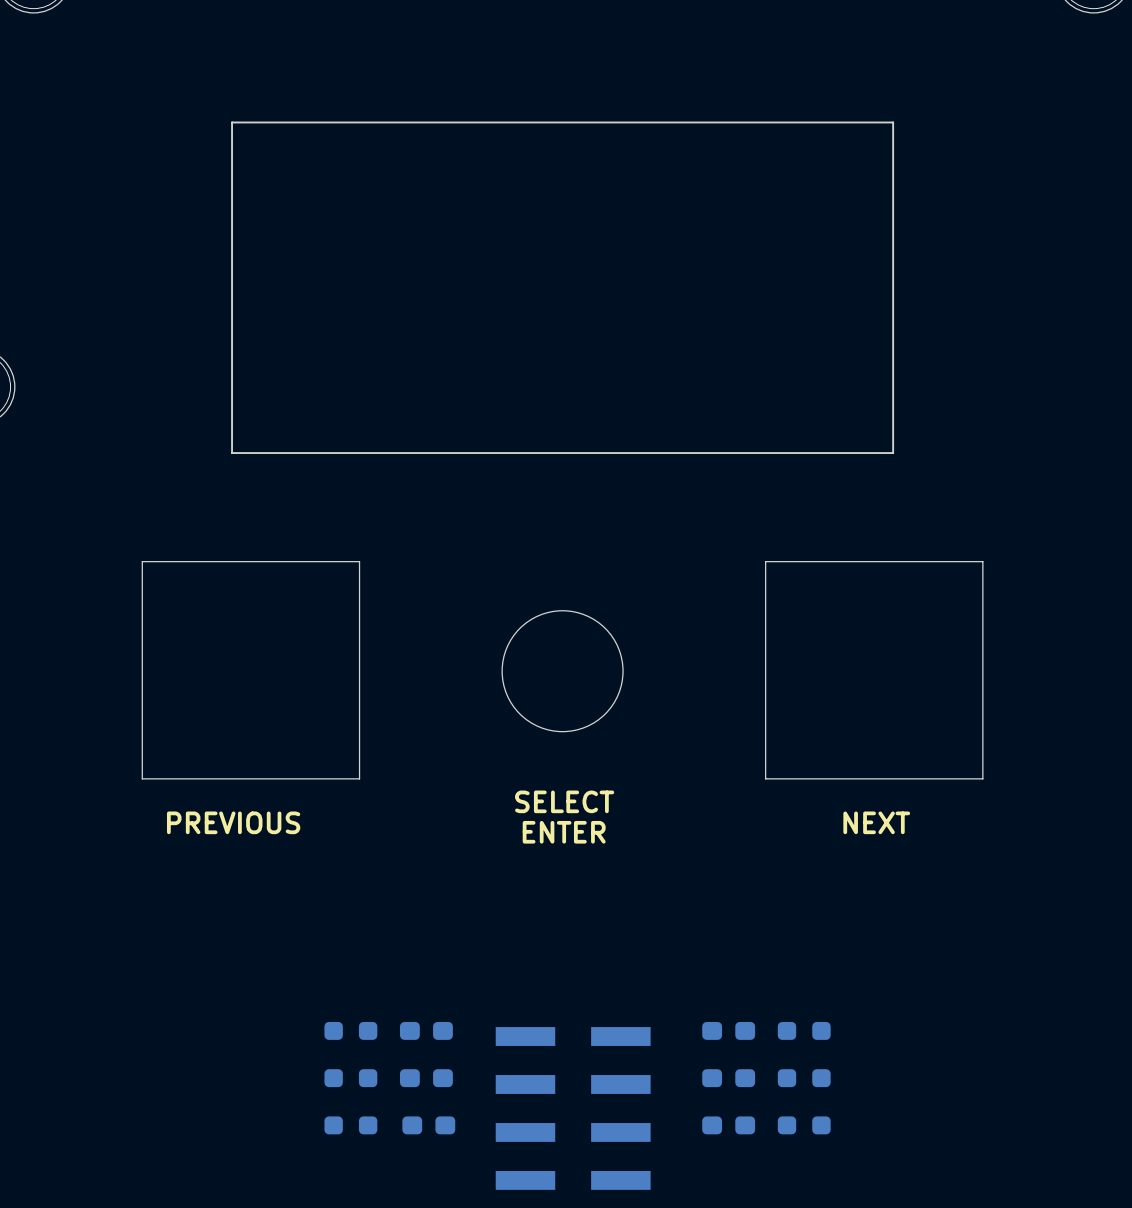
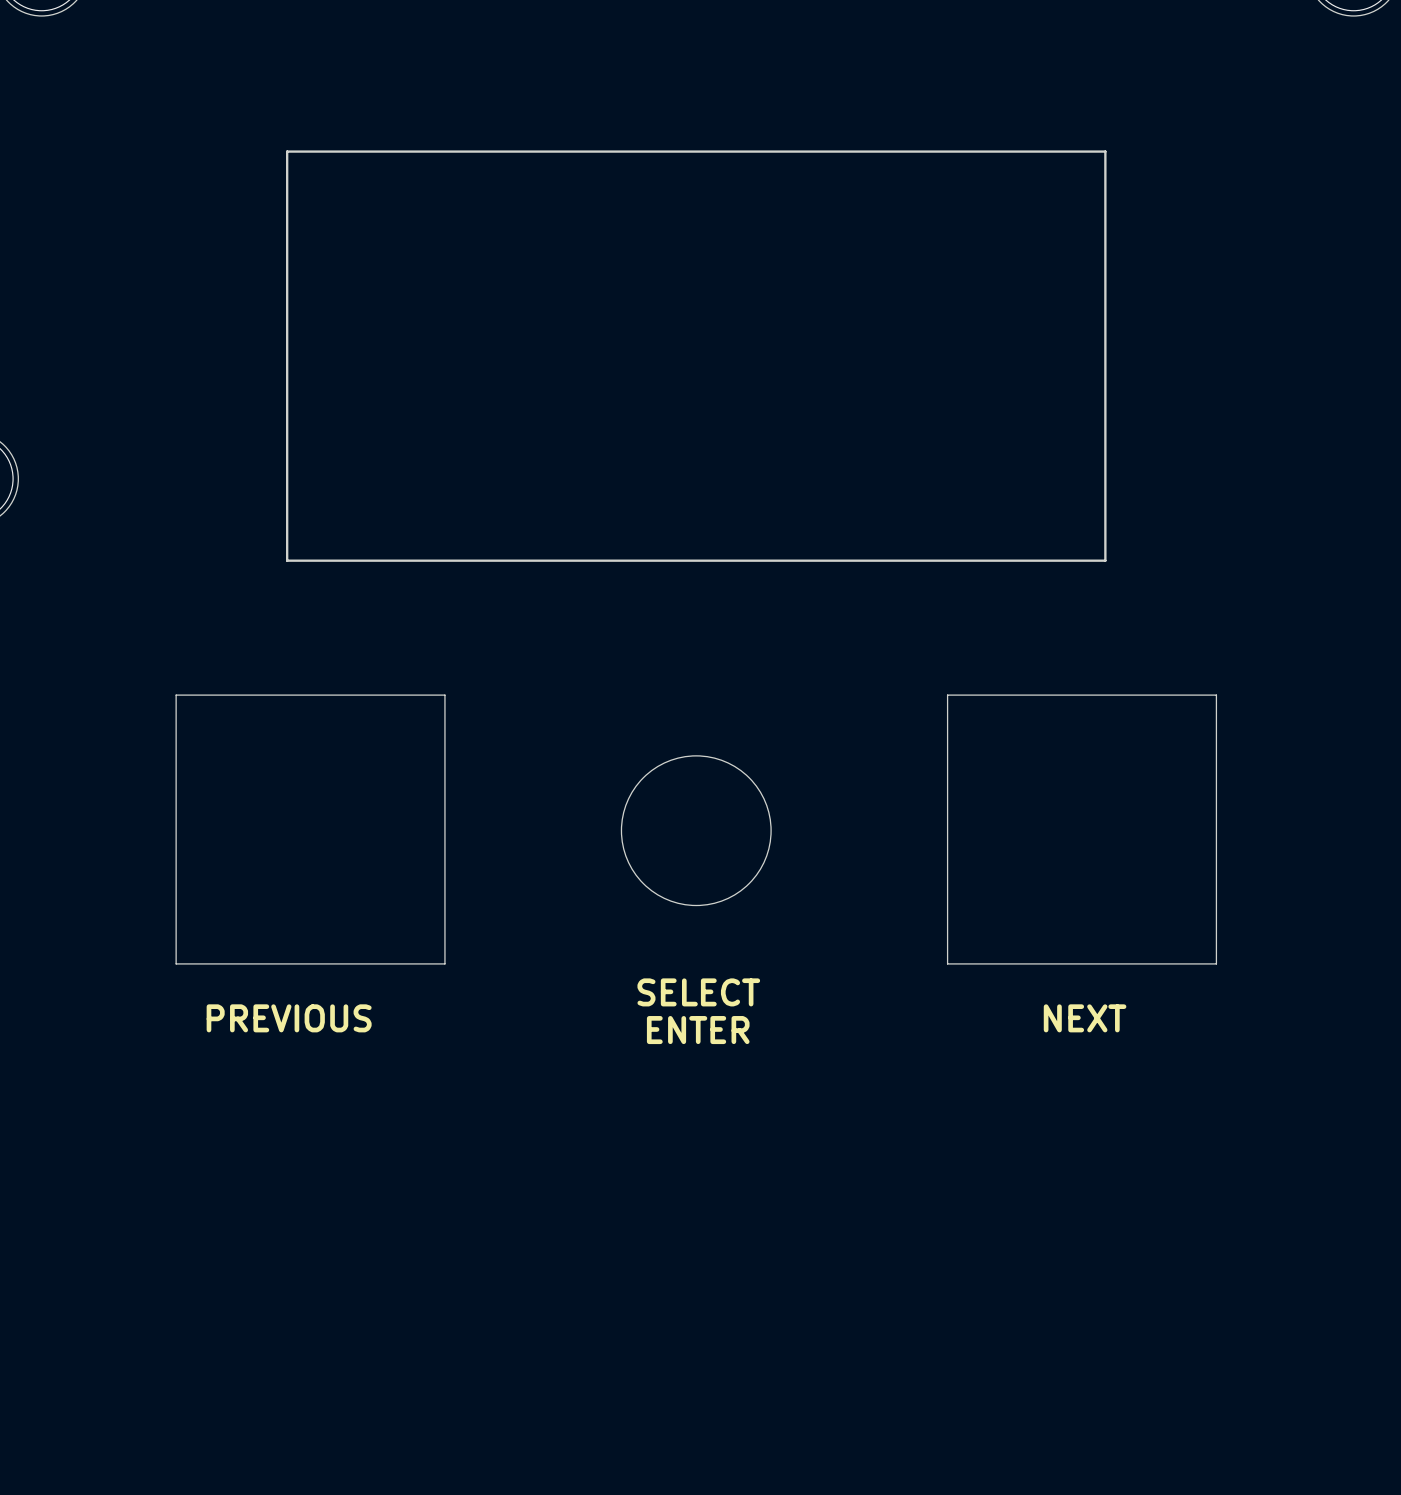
part: (350, 1030) -> none
part: (426, 1030) -> none
part: (728, 1030) -> none
part: (804, 1030) -> none
part: (350, 1078) -> none
part: (426, 1078) -> none
part: (728, 1078) -> none
part: (804, 1078) -> none
part: (573, 1108) -> none
part: (350, 1125) -> none
part: (428, 1125) -> none
part: (728, 1125) -> none
part: (804, 1125) -> none

